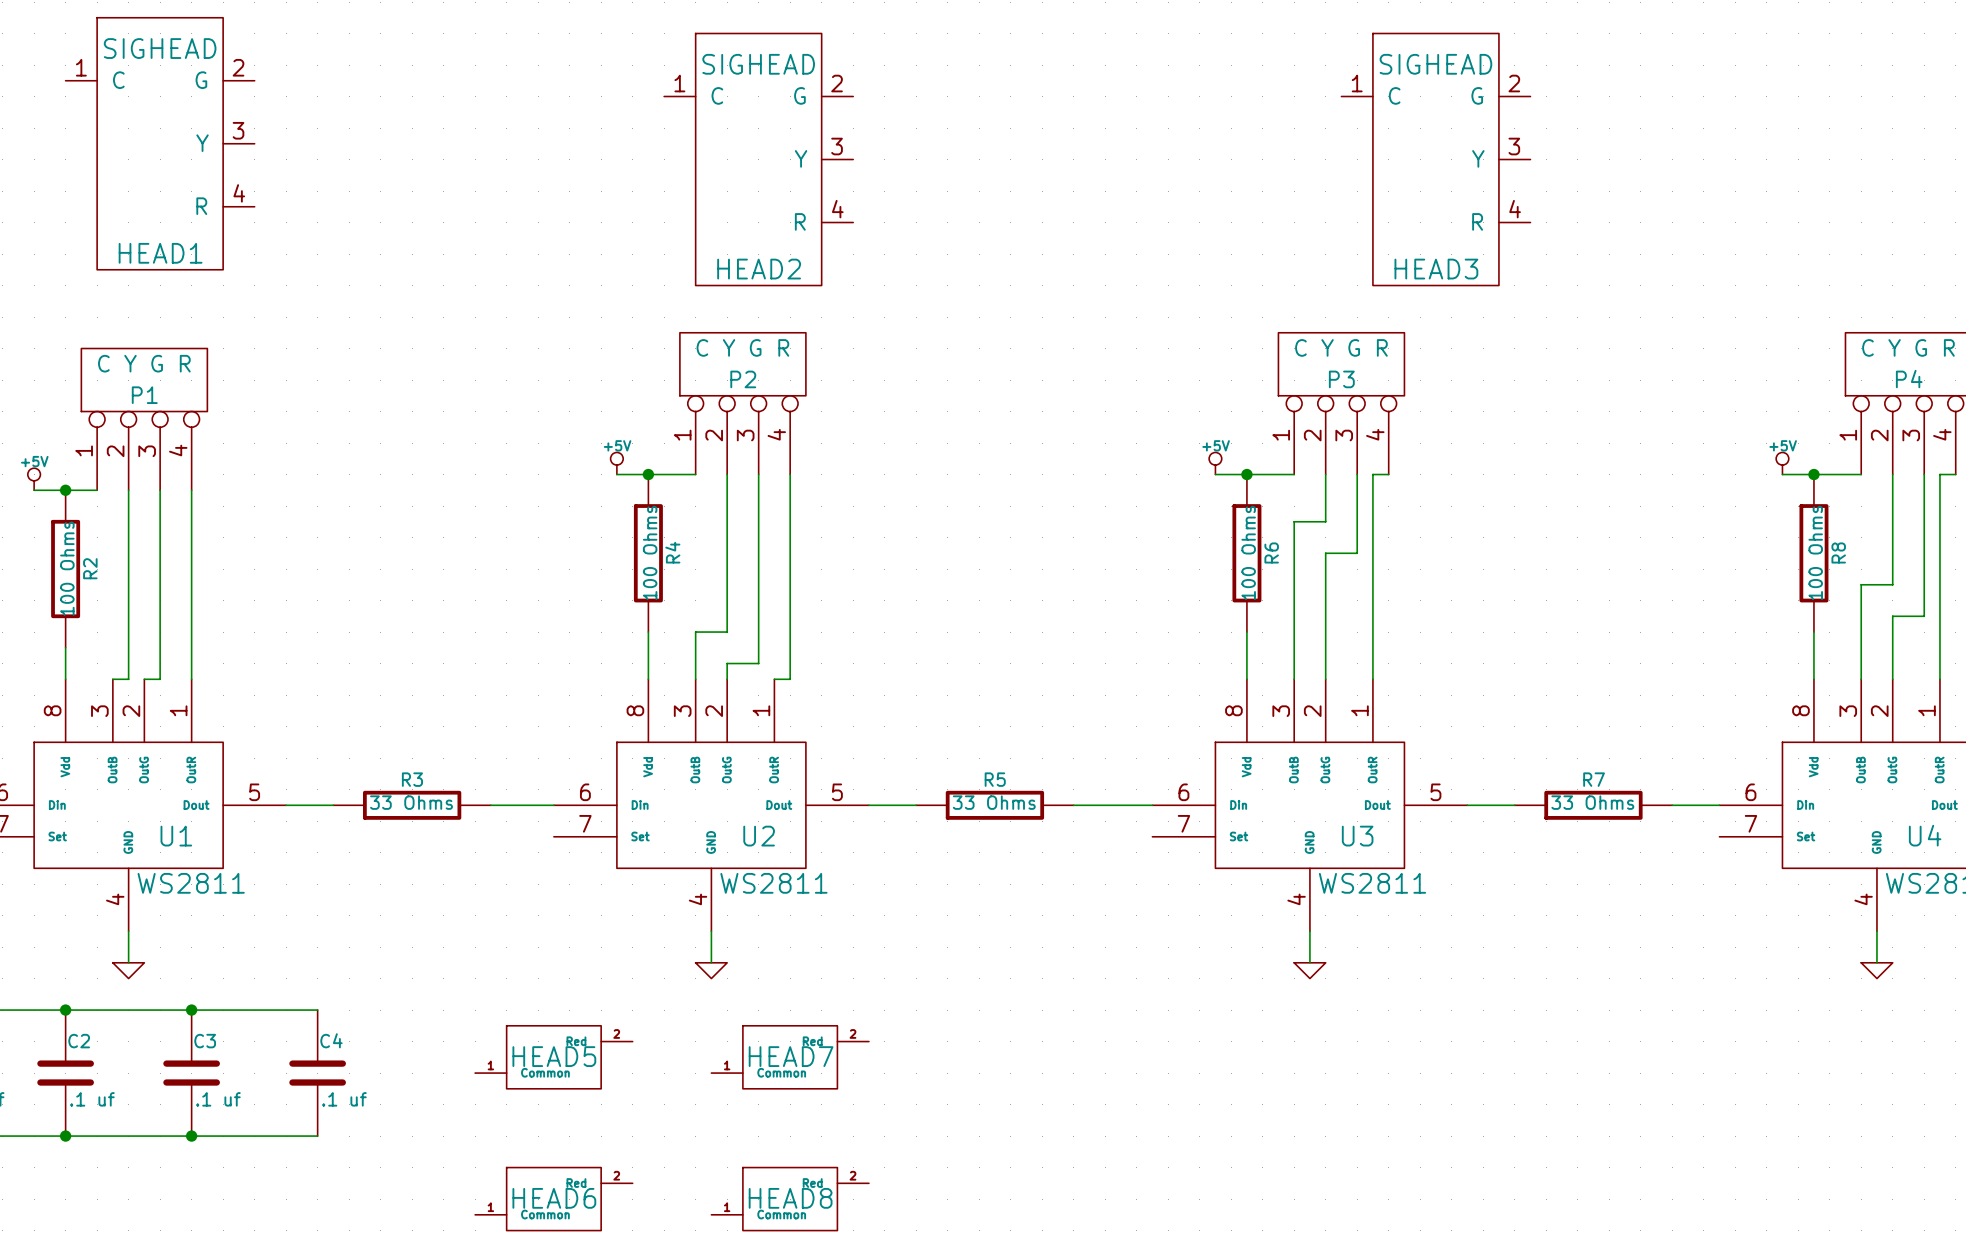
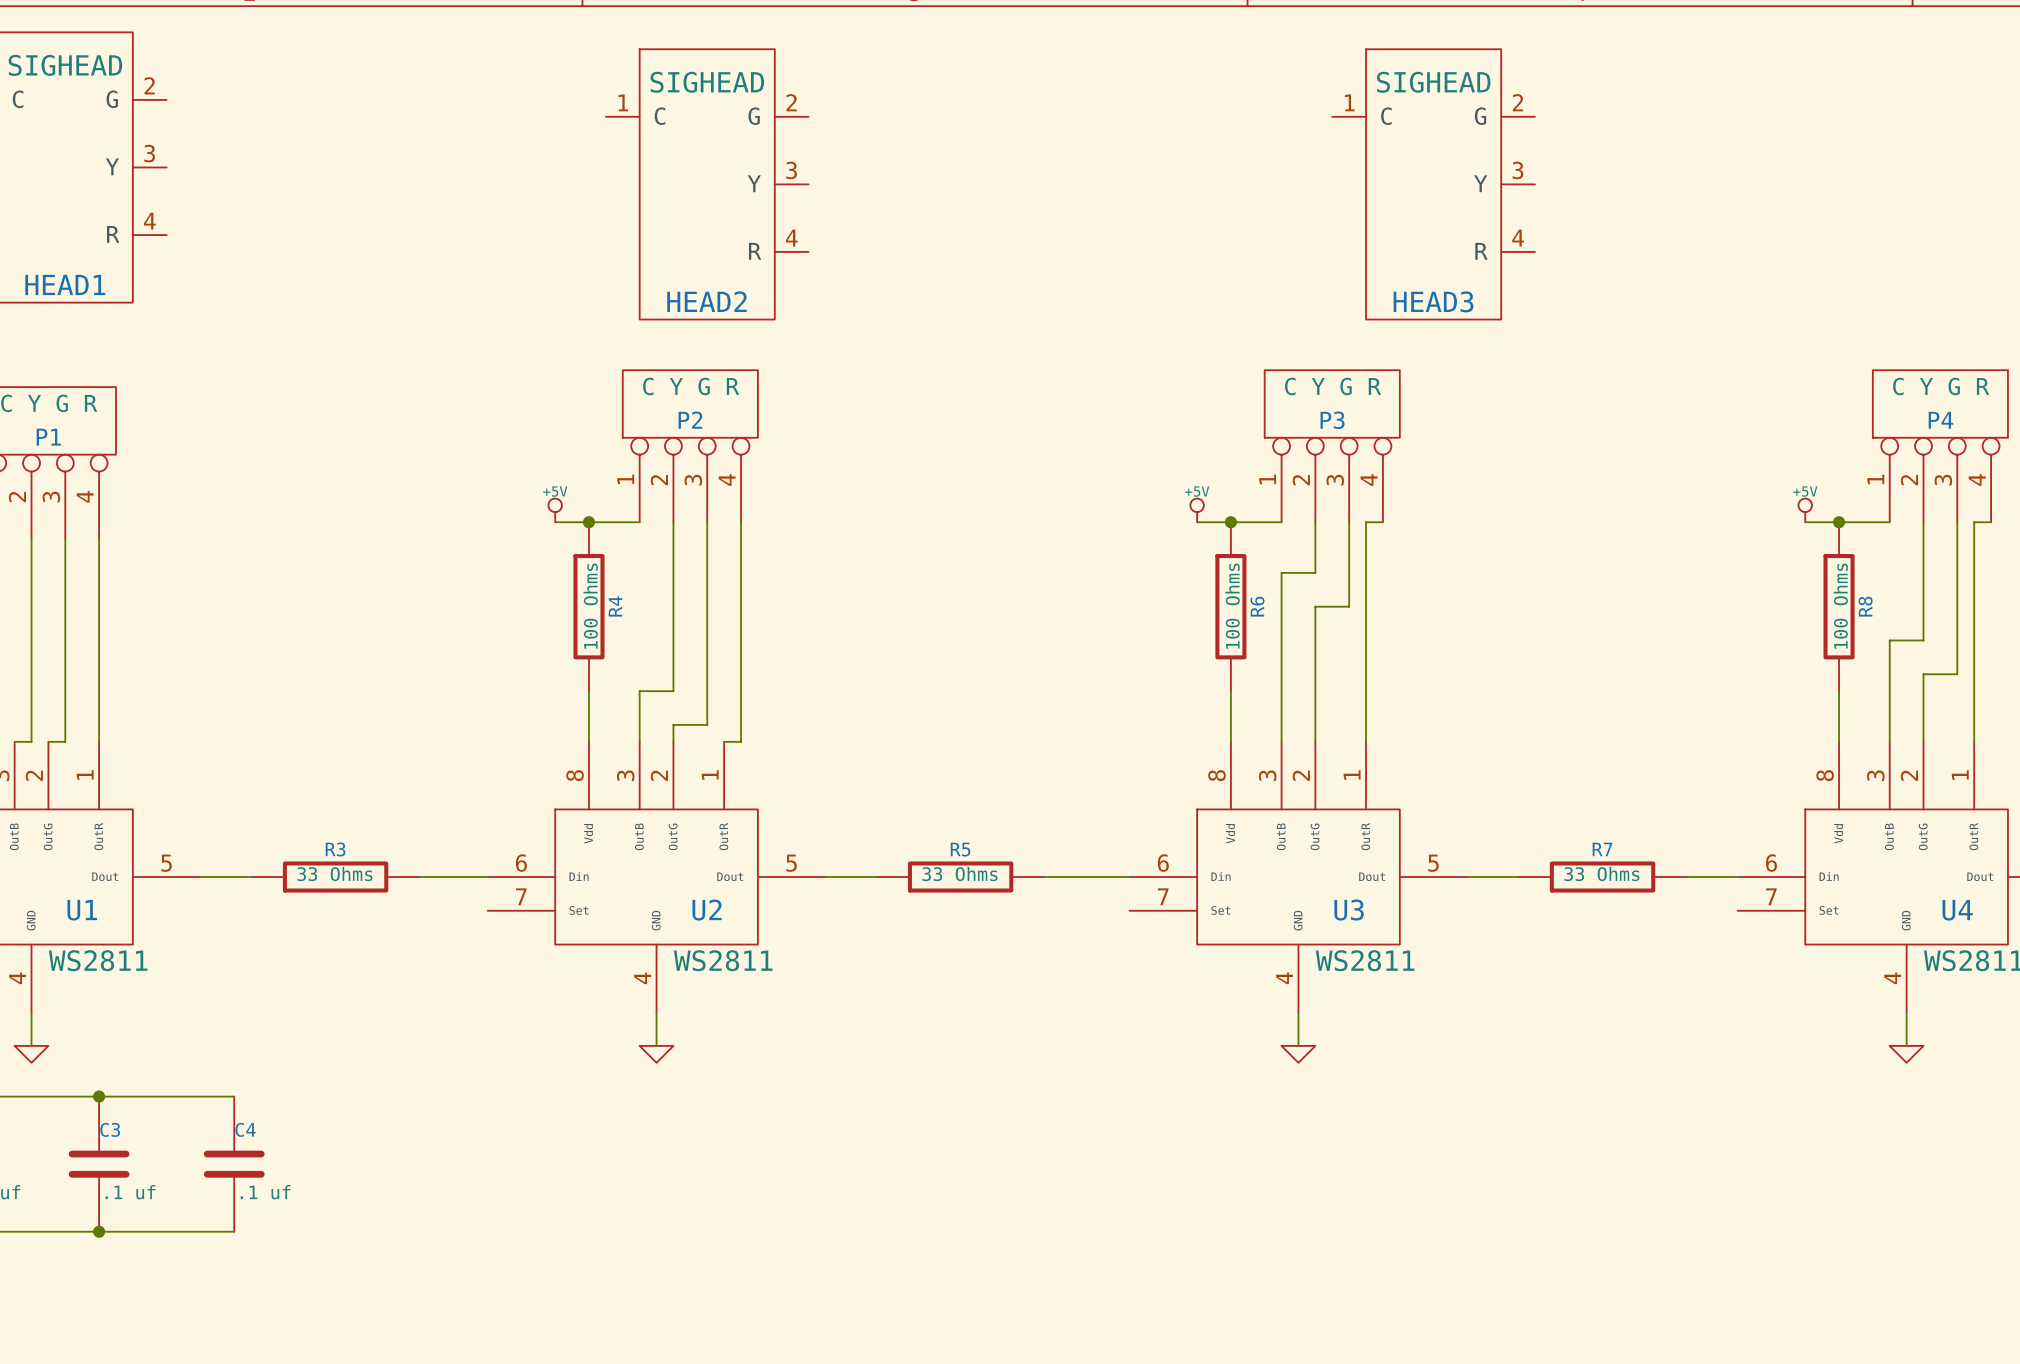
HEAD5: (553, 1057) -> none
HEAD7: (790, 1057) -> none
HEAD6: (553, 1199) -> none
HEAD8: (790, 1199) -> none

